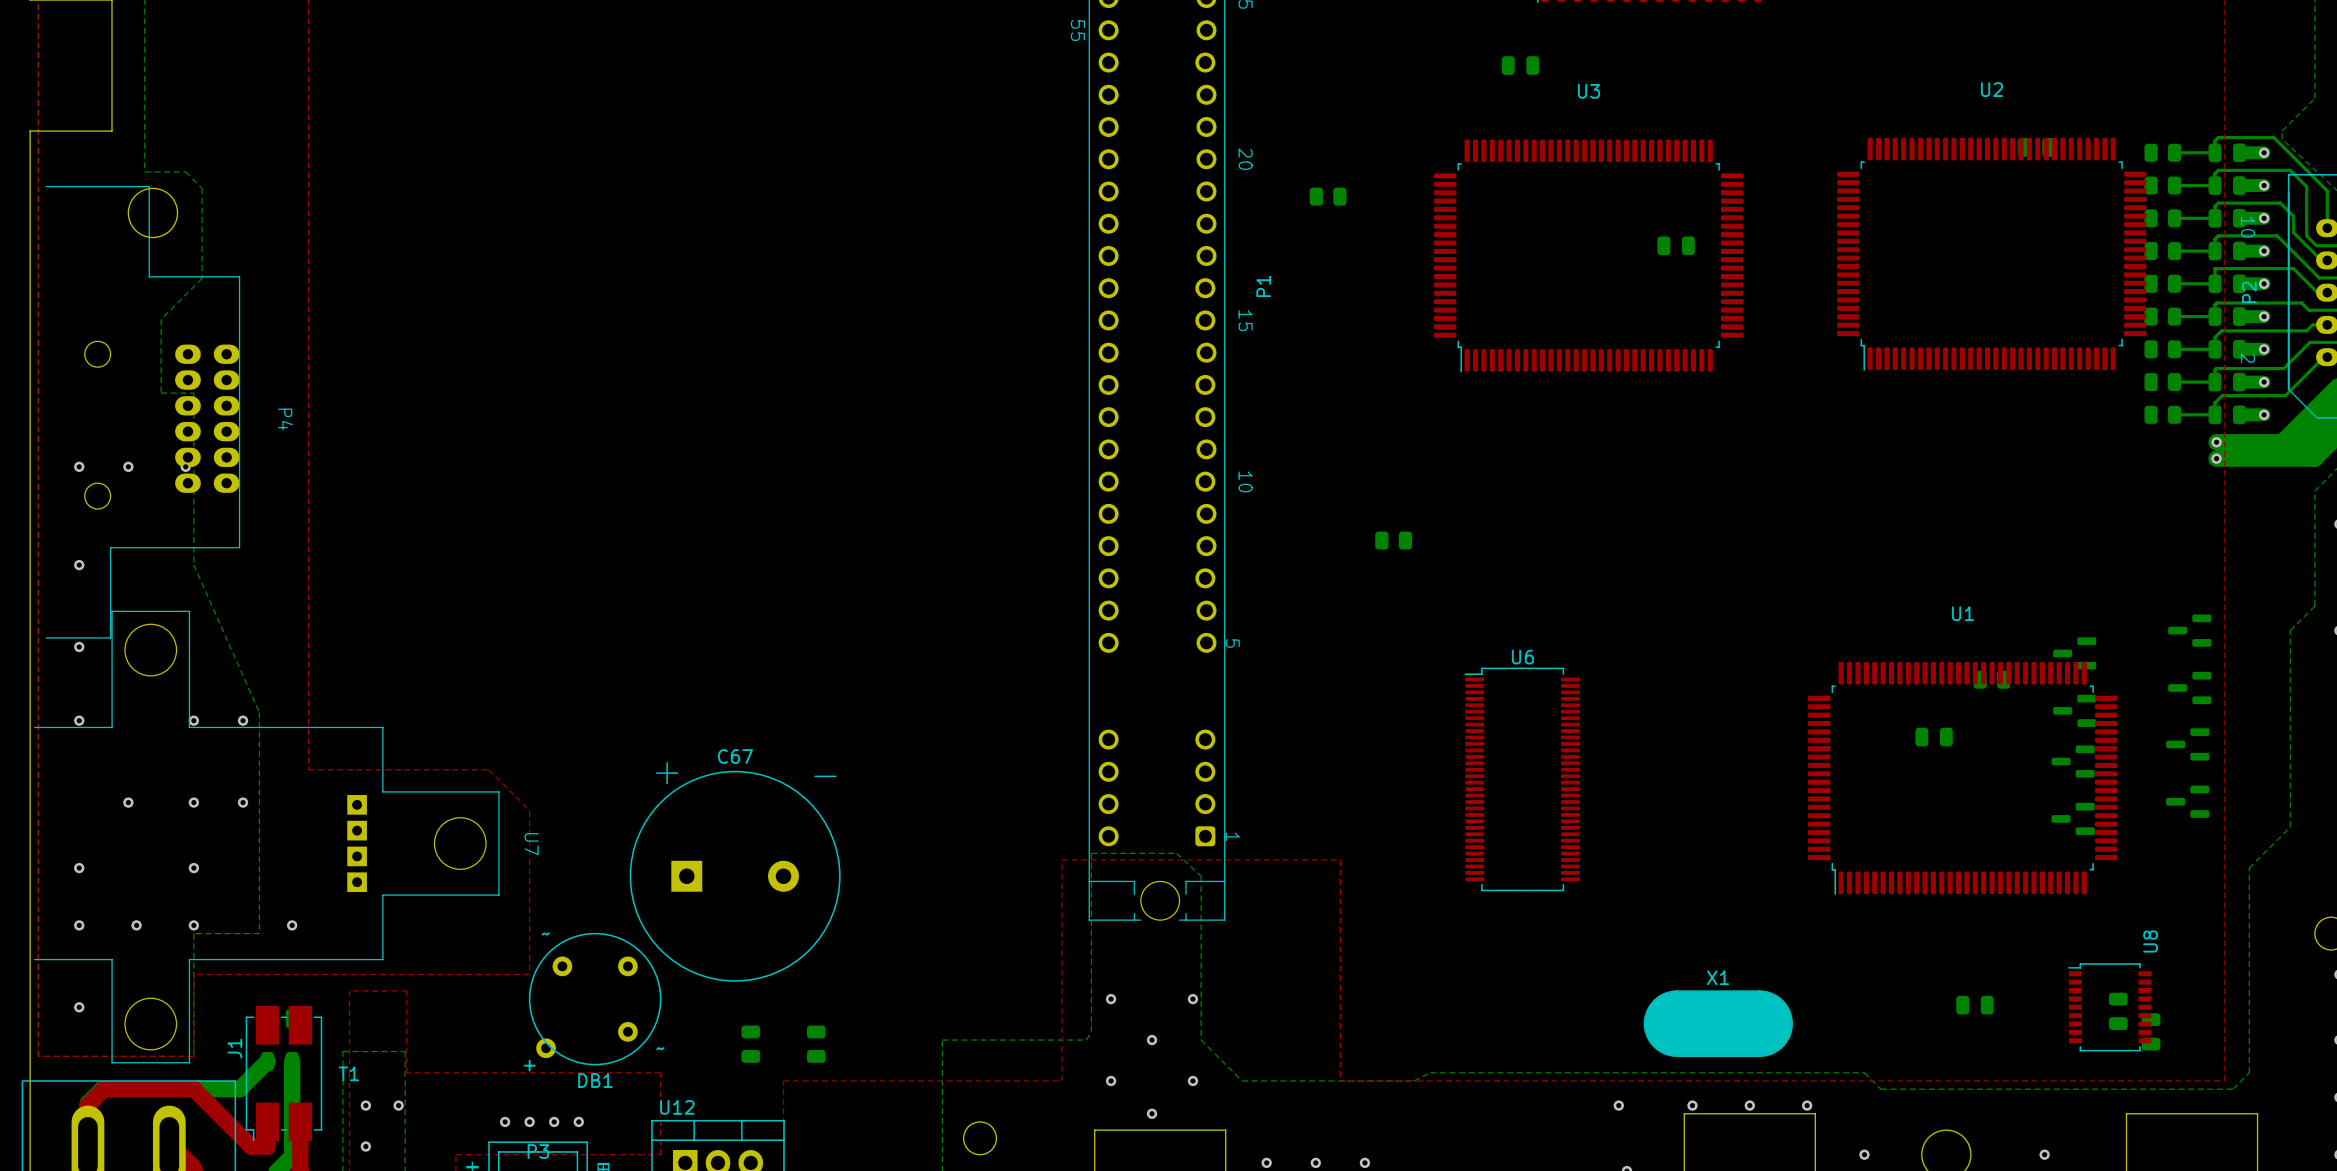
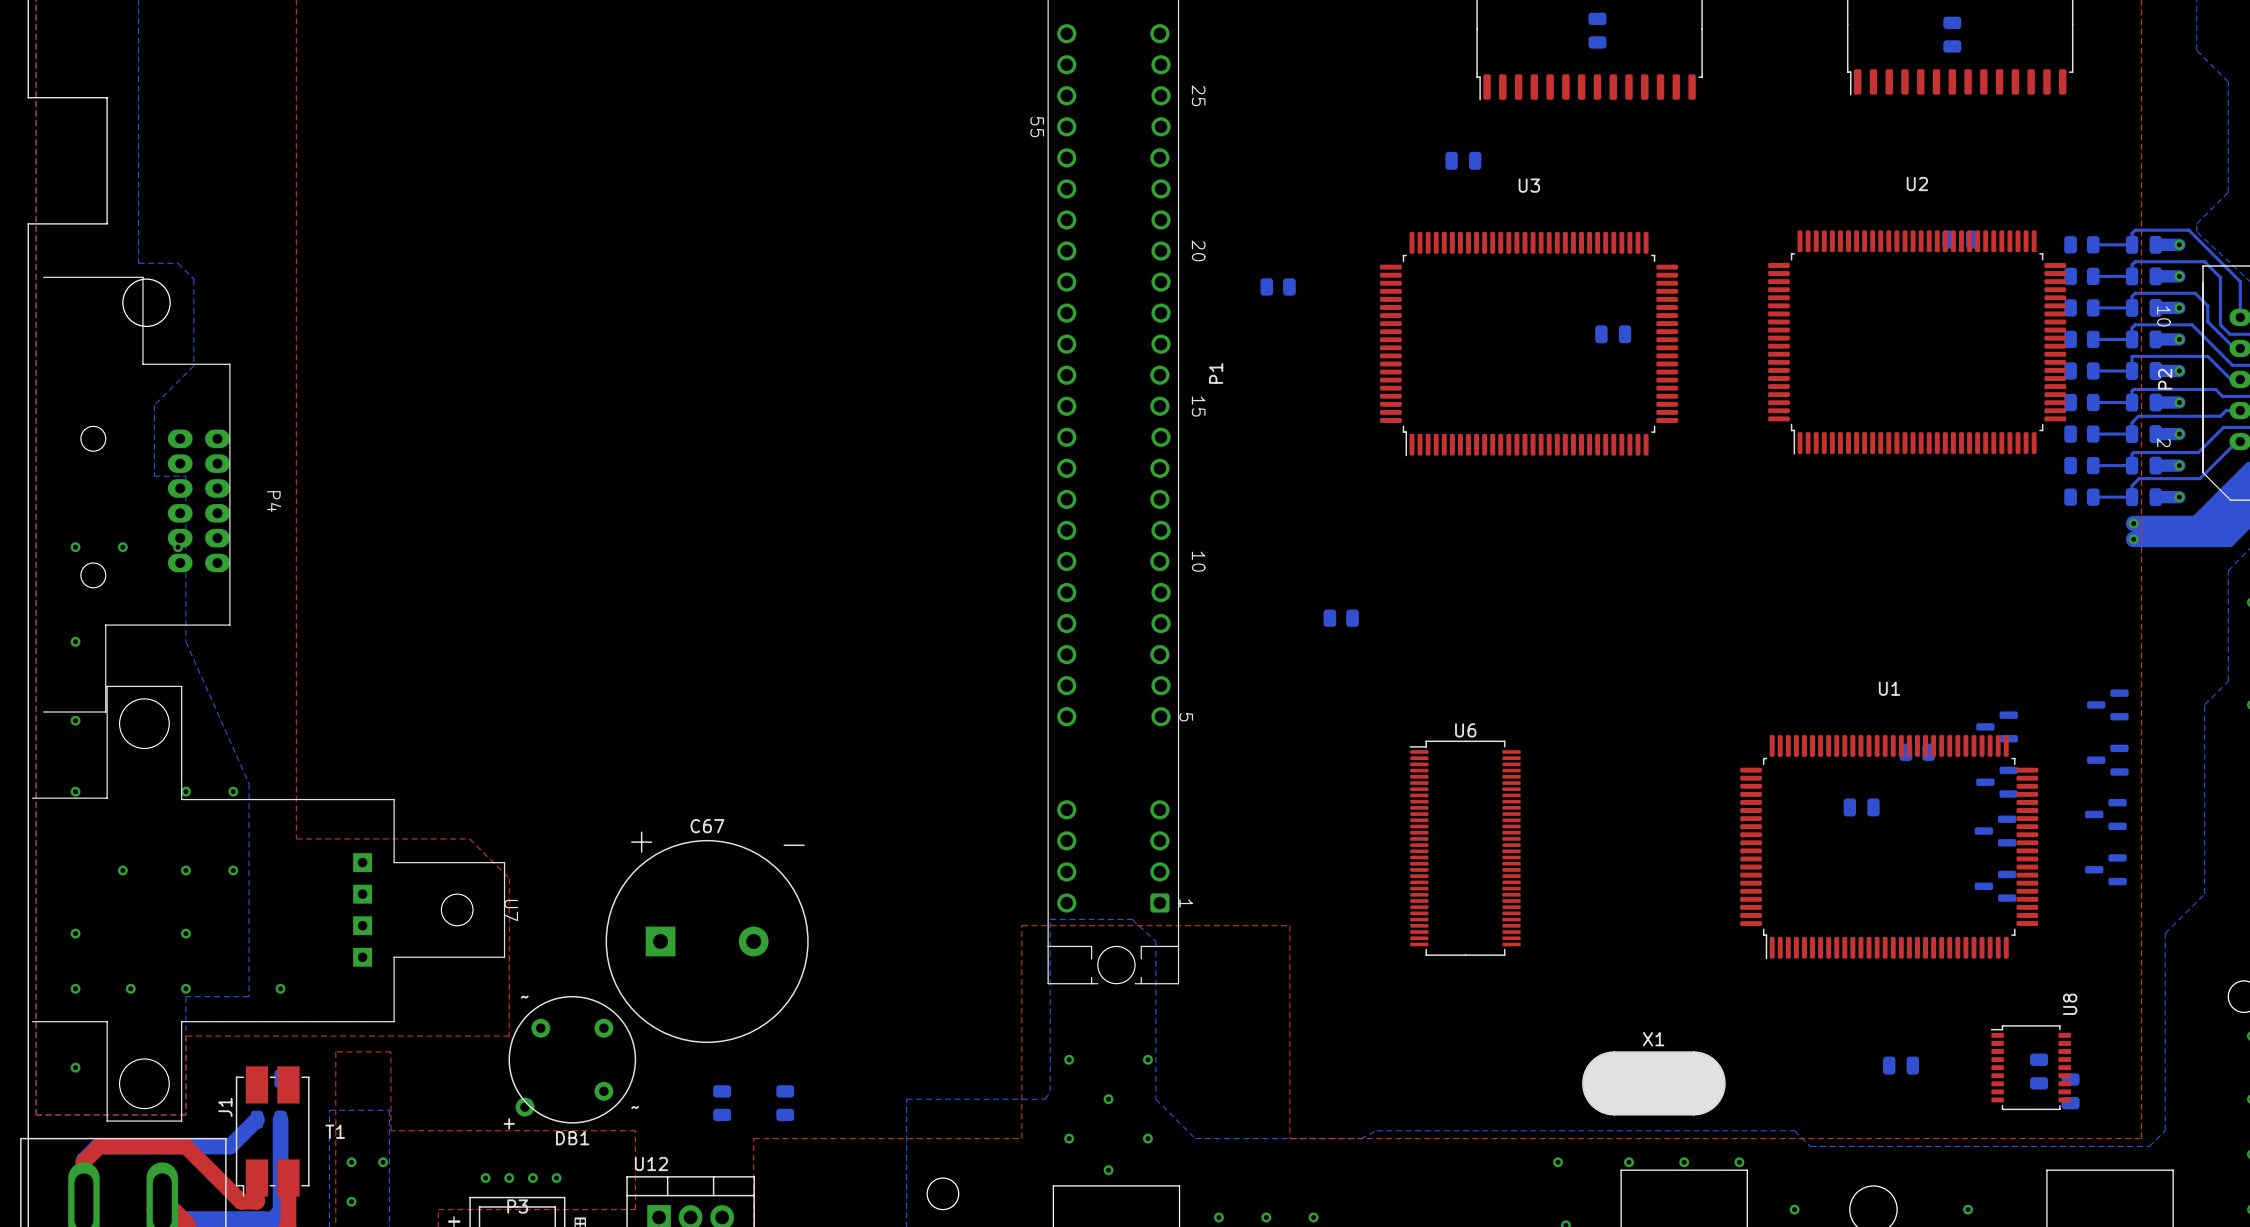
U7 footprint: [34, 610, 500, 1064] -> [32, 685, 506, 1122]

